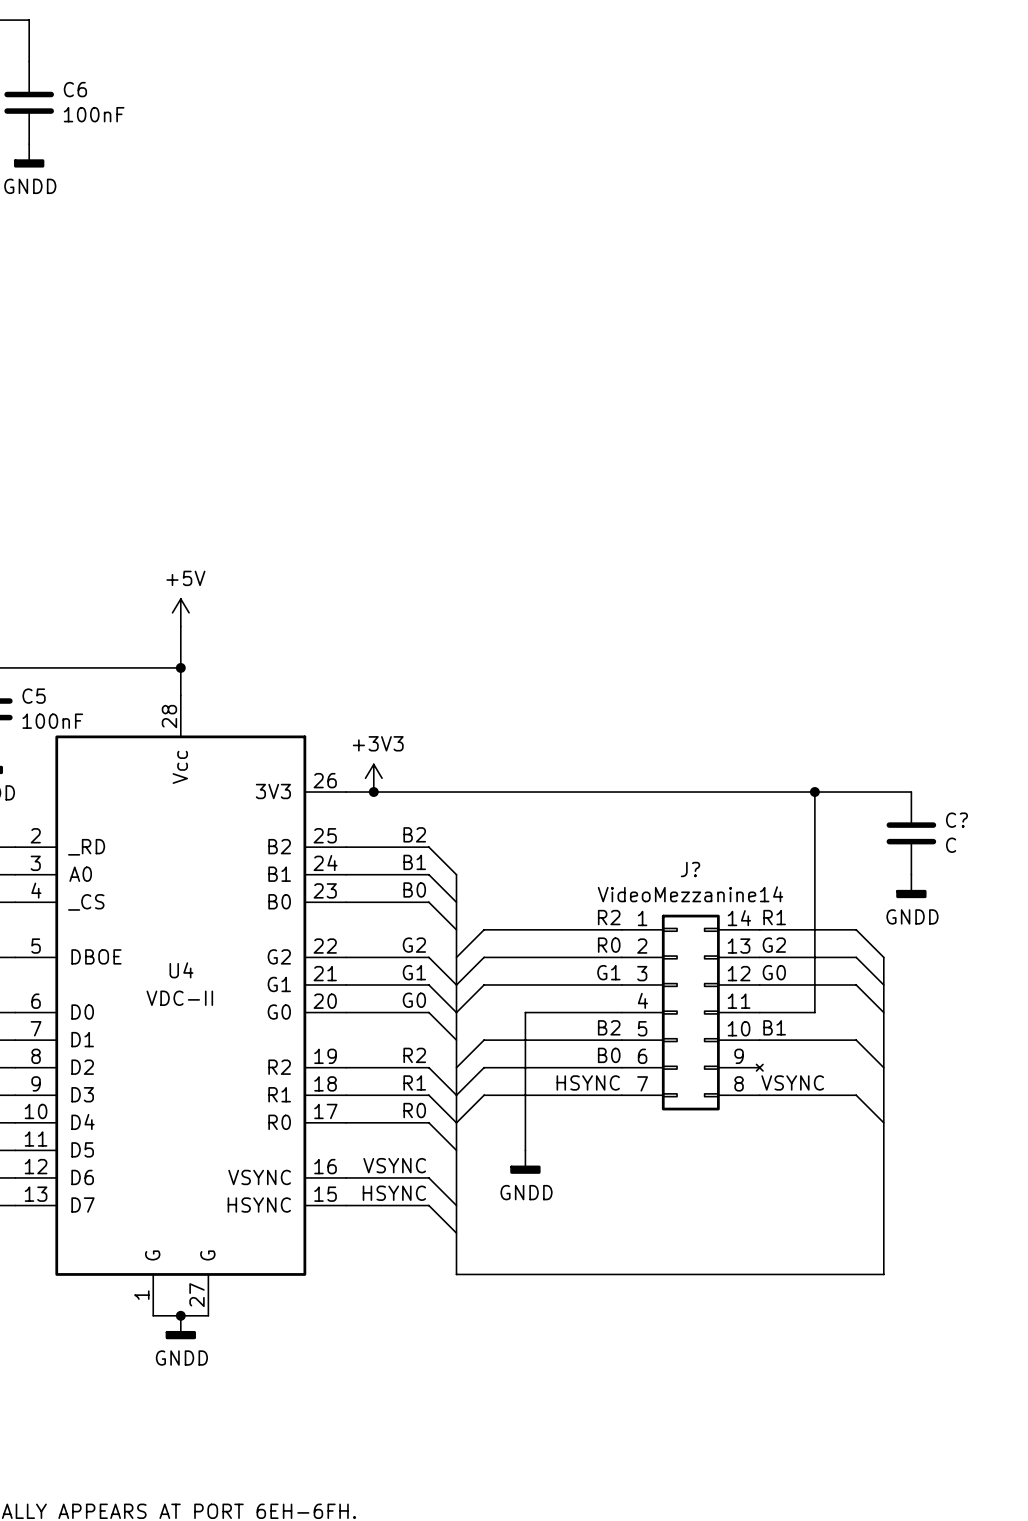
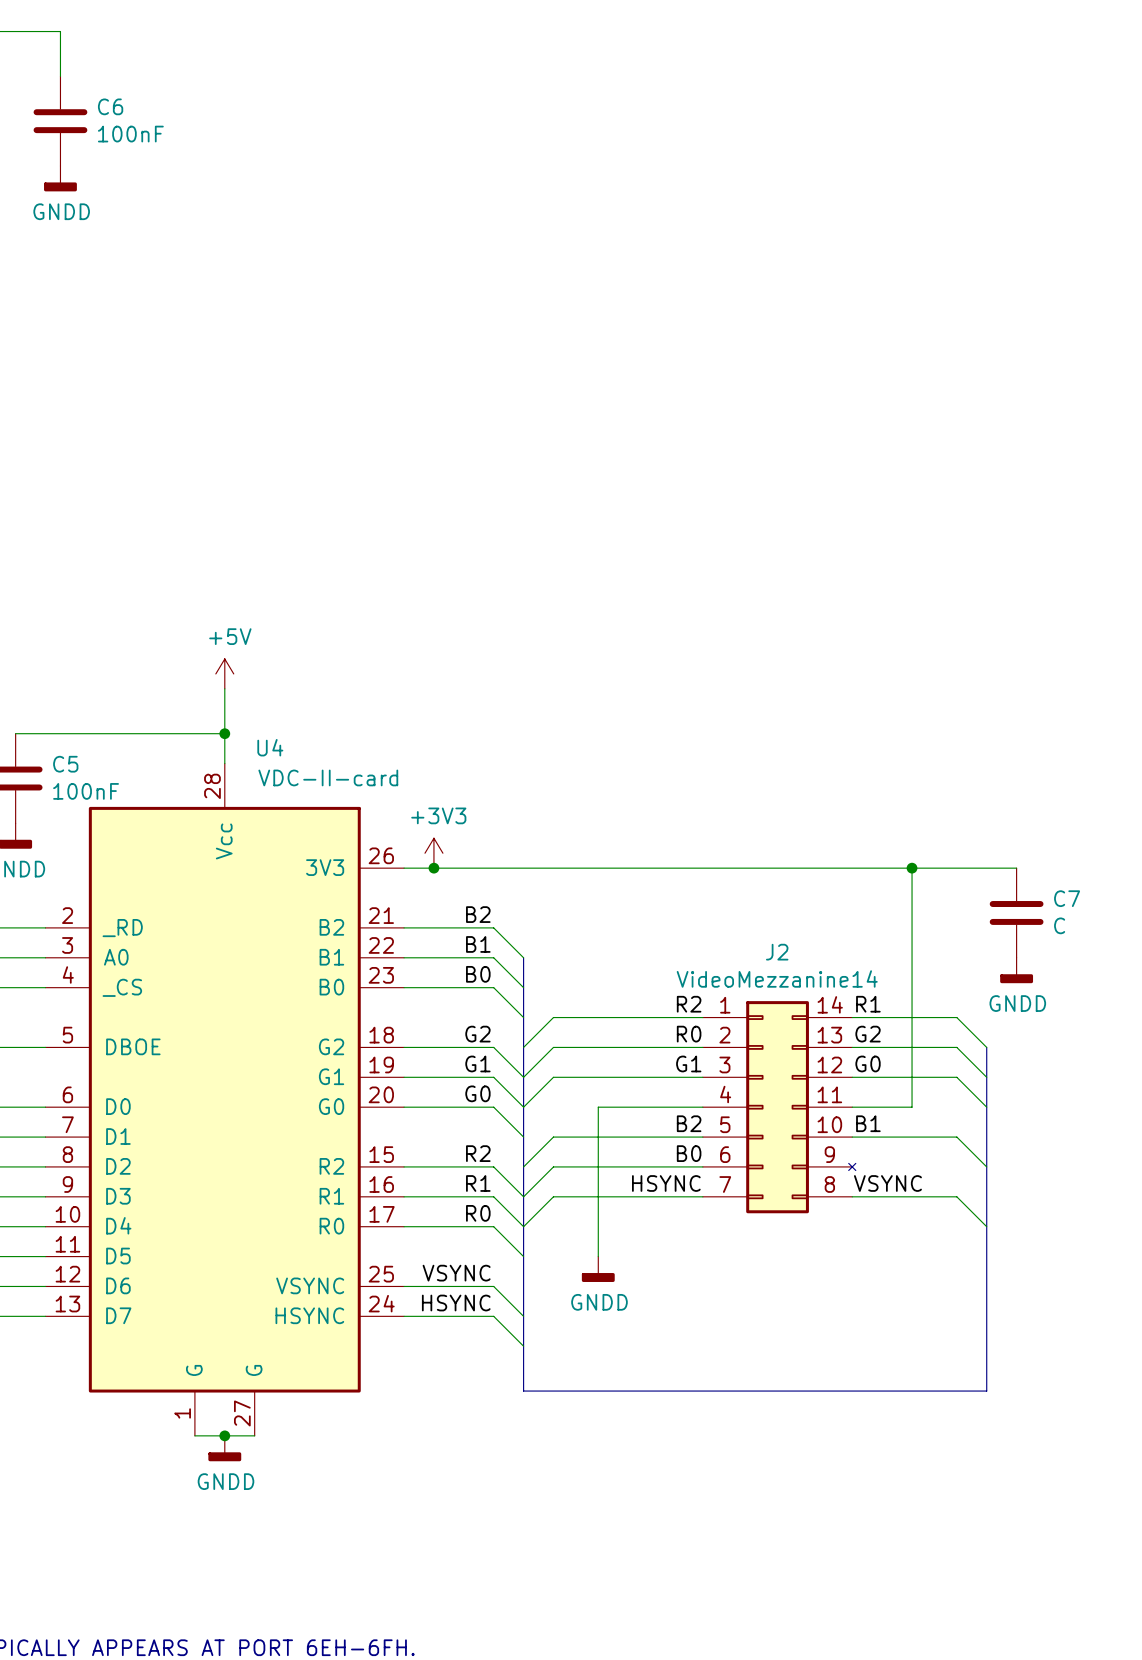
C? name: C? (956, 820) -> C7 (1067, 898)
U4 pin number: 25 (325, 835) -> 21 (381, 915)
U4 pin number: 24 (325, 863) -> 22 (381, 945)
J? name: J? (690, 869) -> J2 (777, 952)
U4 pin number: 22 (325, 946) -> 18 (381, 1035)
U4 name position: U4 (181, 970) -> U4 (270, 747)
U4 pin number: 21 (325, 973) -> 19 (381, 1064)
U4 value: VDC-II (179, 998) -> VDC-II-card (328, 777)
U4 pin number: 19 (325, 1056) -> 15 (381, 1154)
U4 pin number: 18 (325, 1083) -> 16 (381, 1184)
U4 pin number: 16 (325, 1166) -> 25 (381, 1274)
U4 pin number: 15 (325, 1194) -> 24 (381, 1303)

